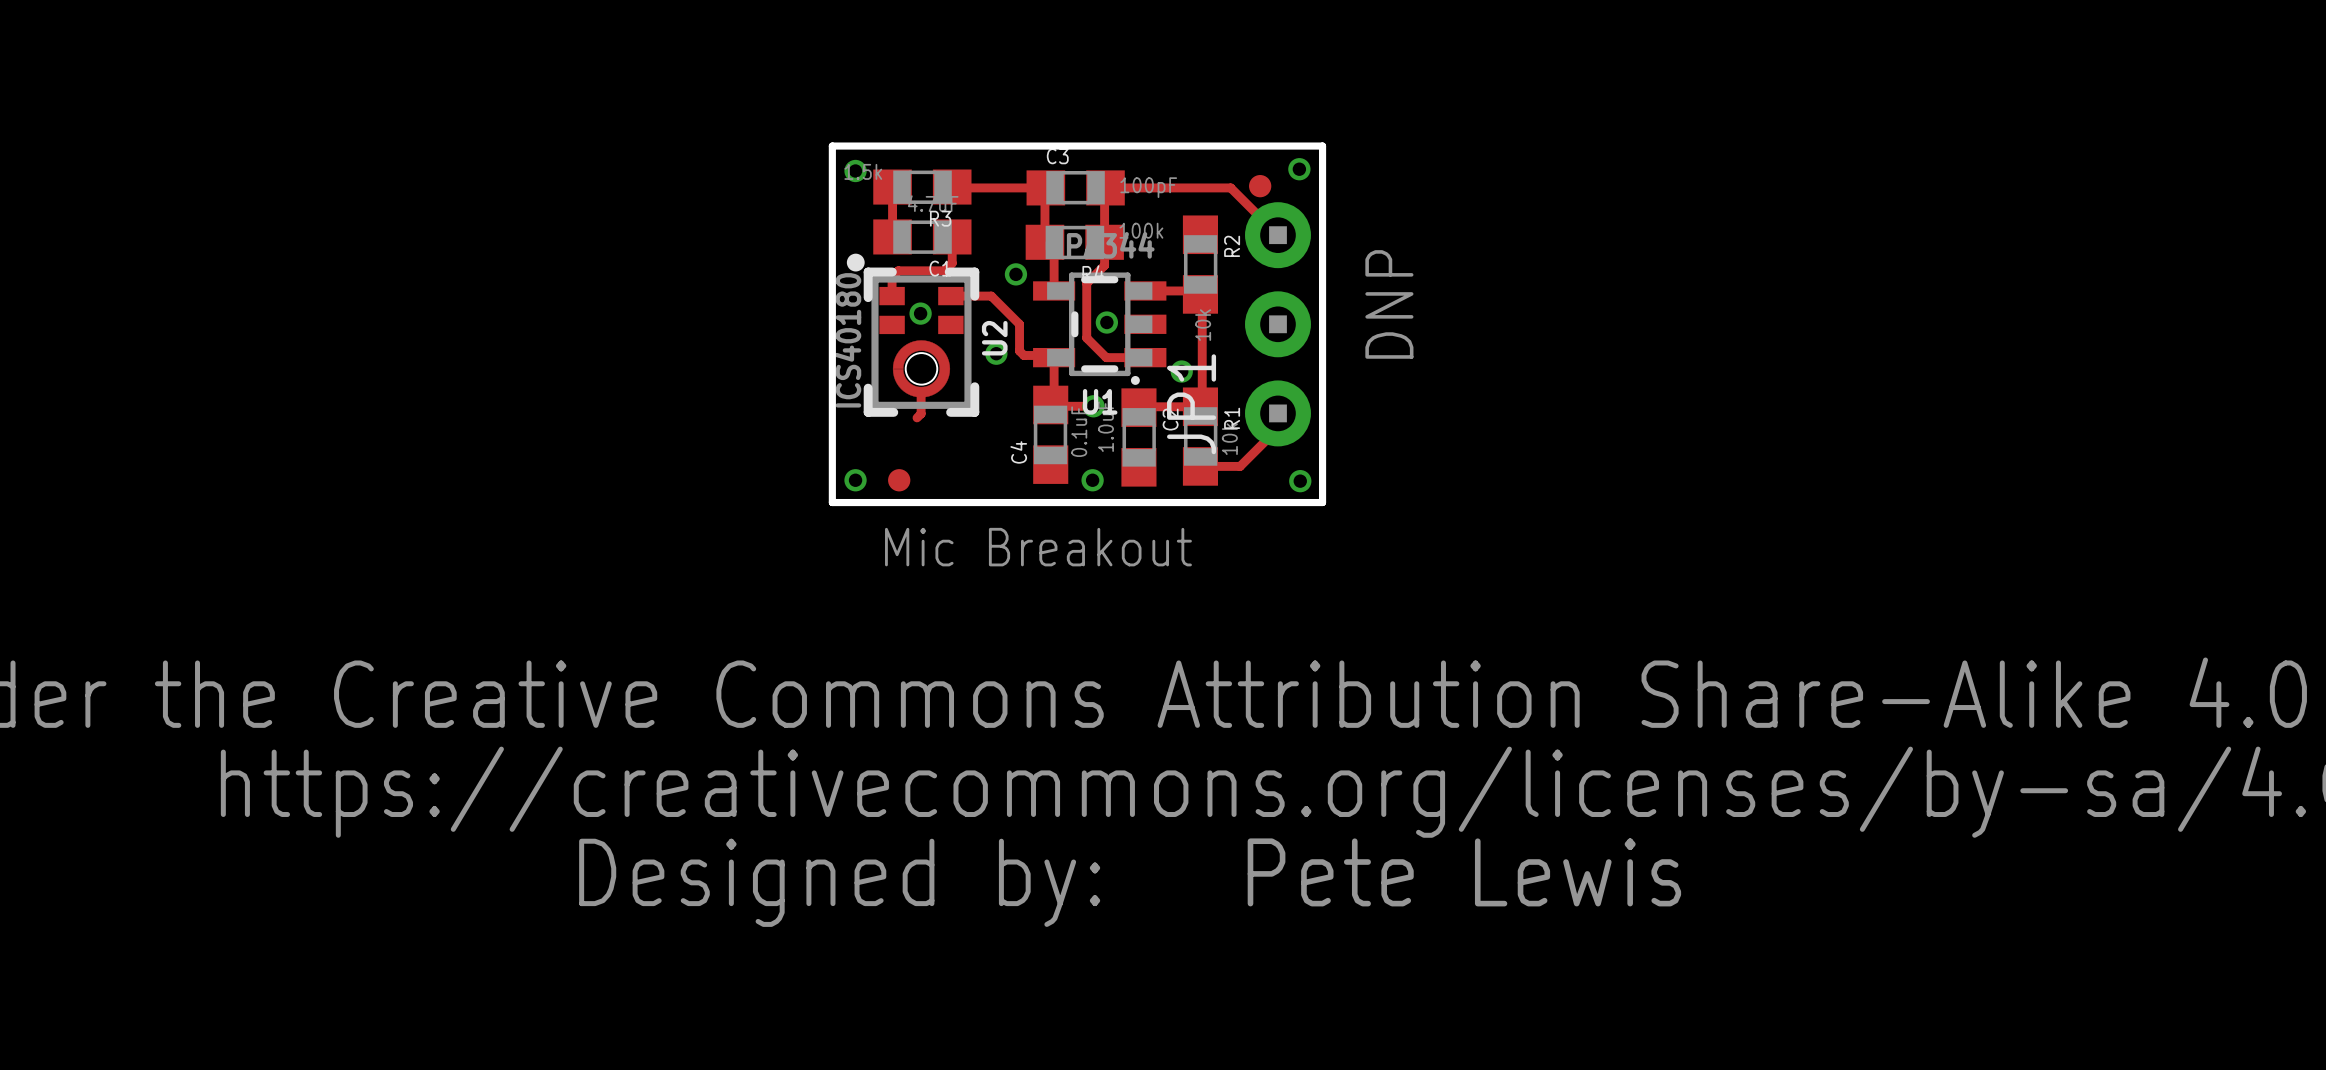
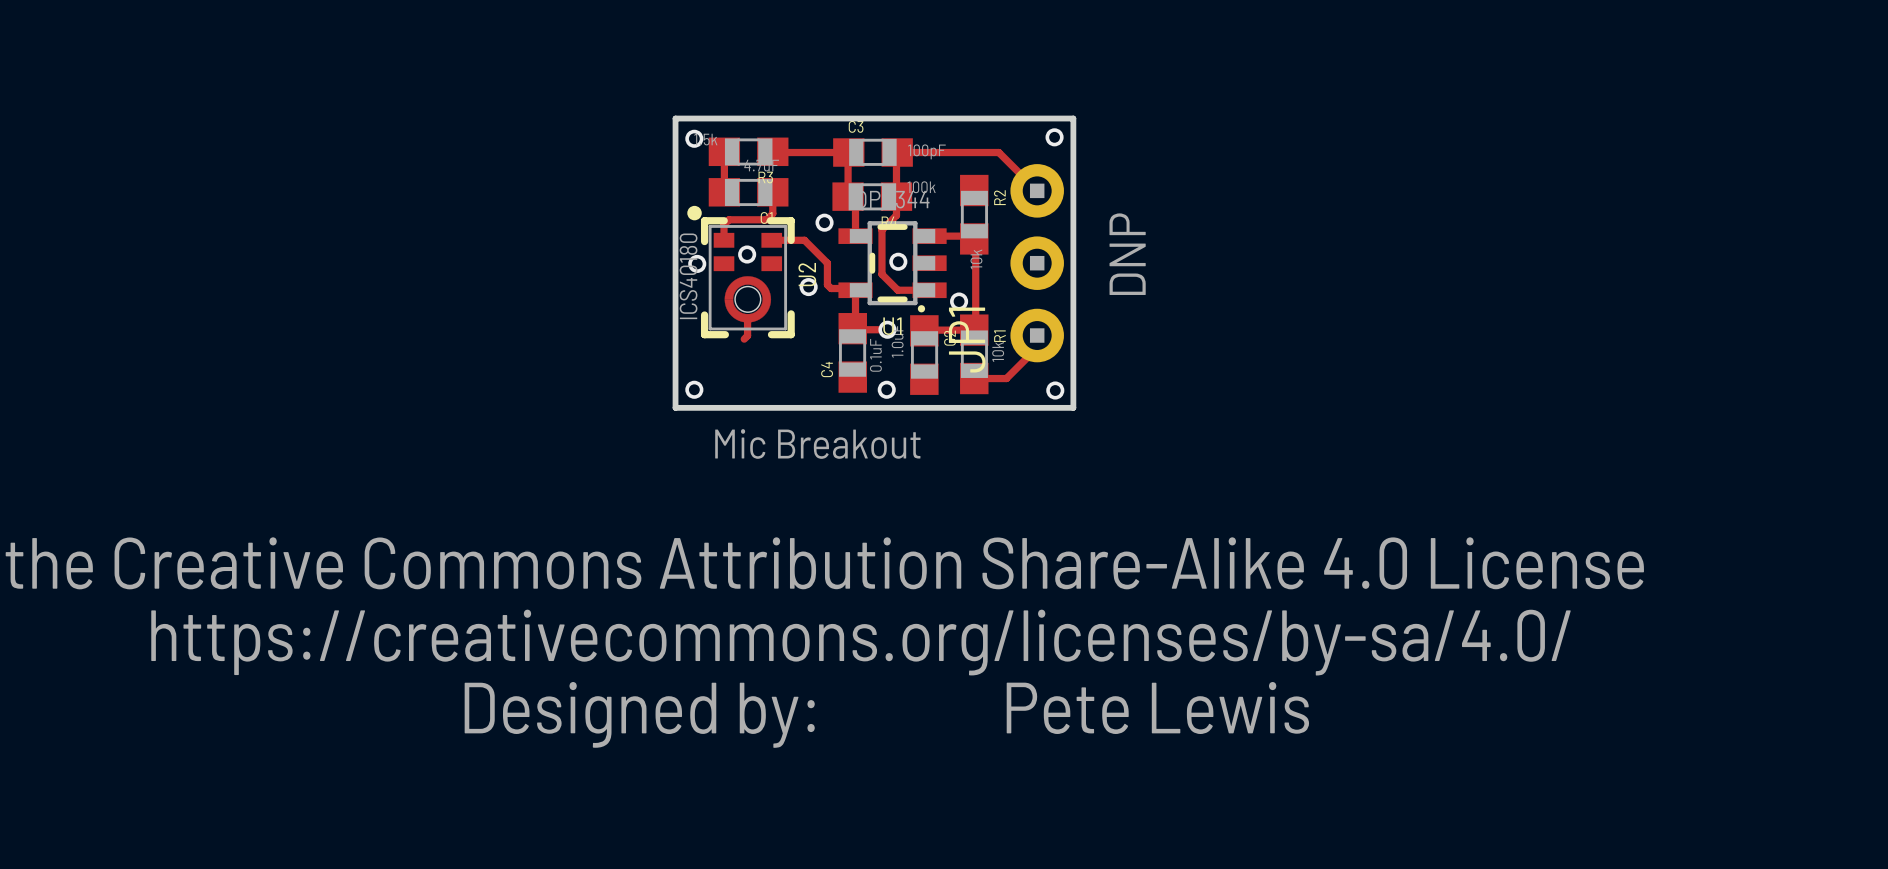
part: (1260, 186) -> none
U2 footprint: [846, 253, 980, 417] -> [687, 205, 795, 339]
via: none -> (697, 263)
part: (899, 480) -> none

